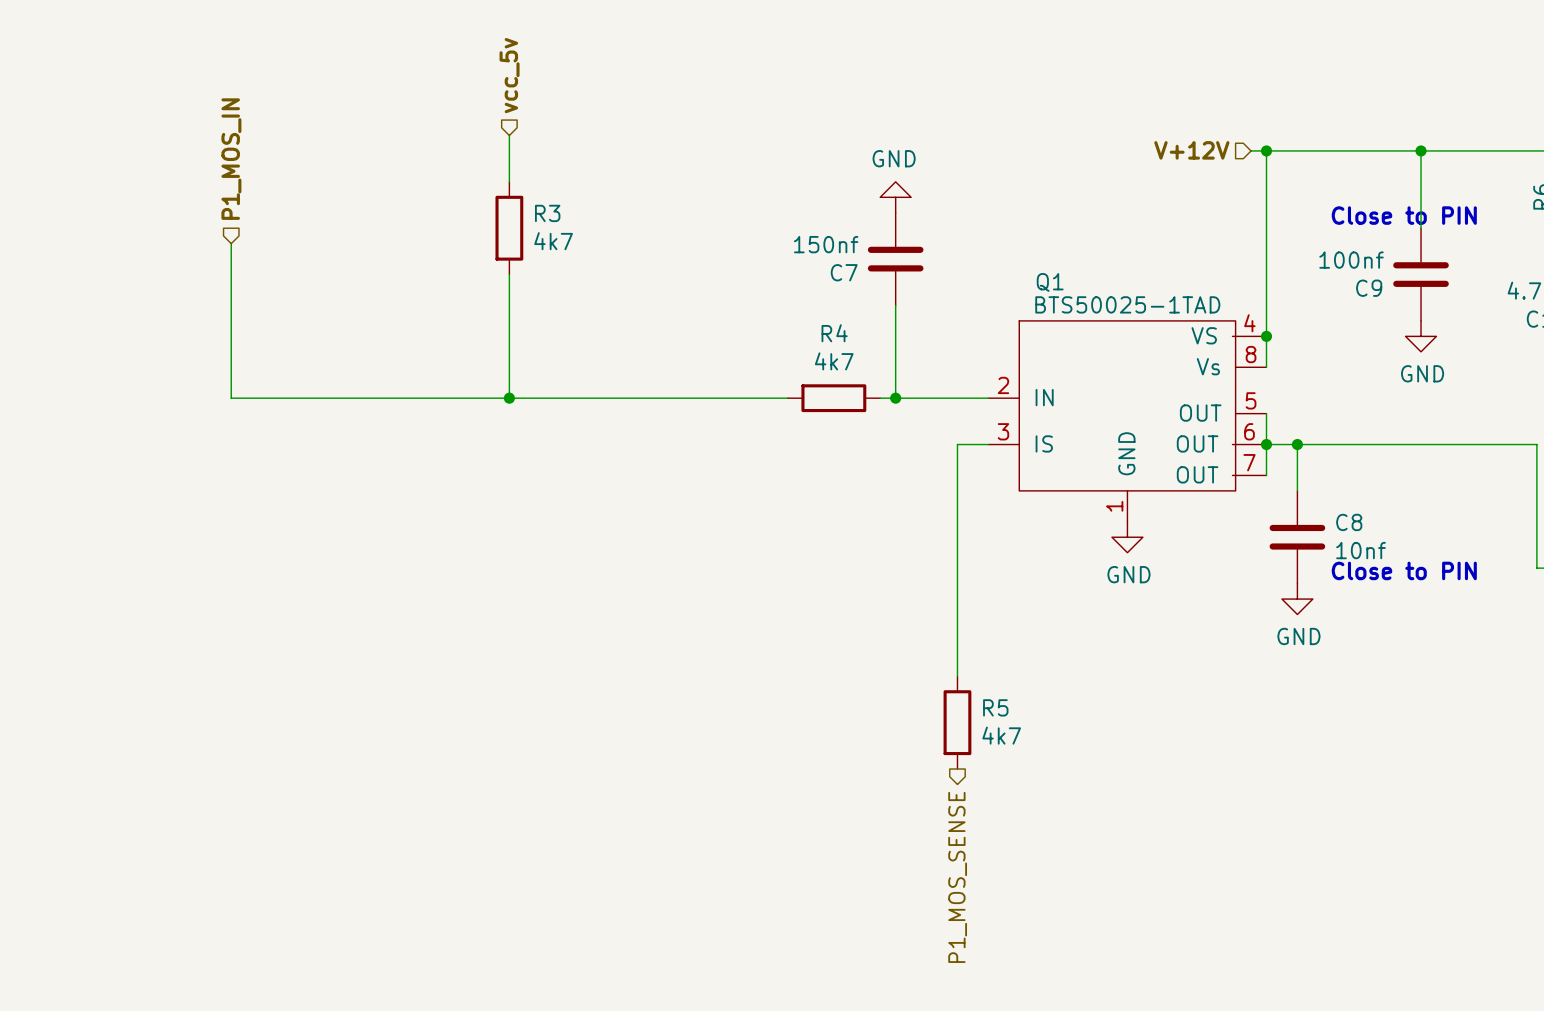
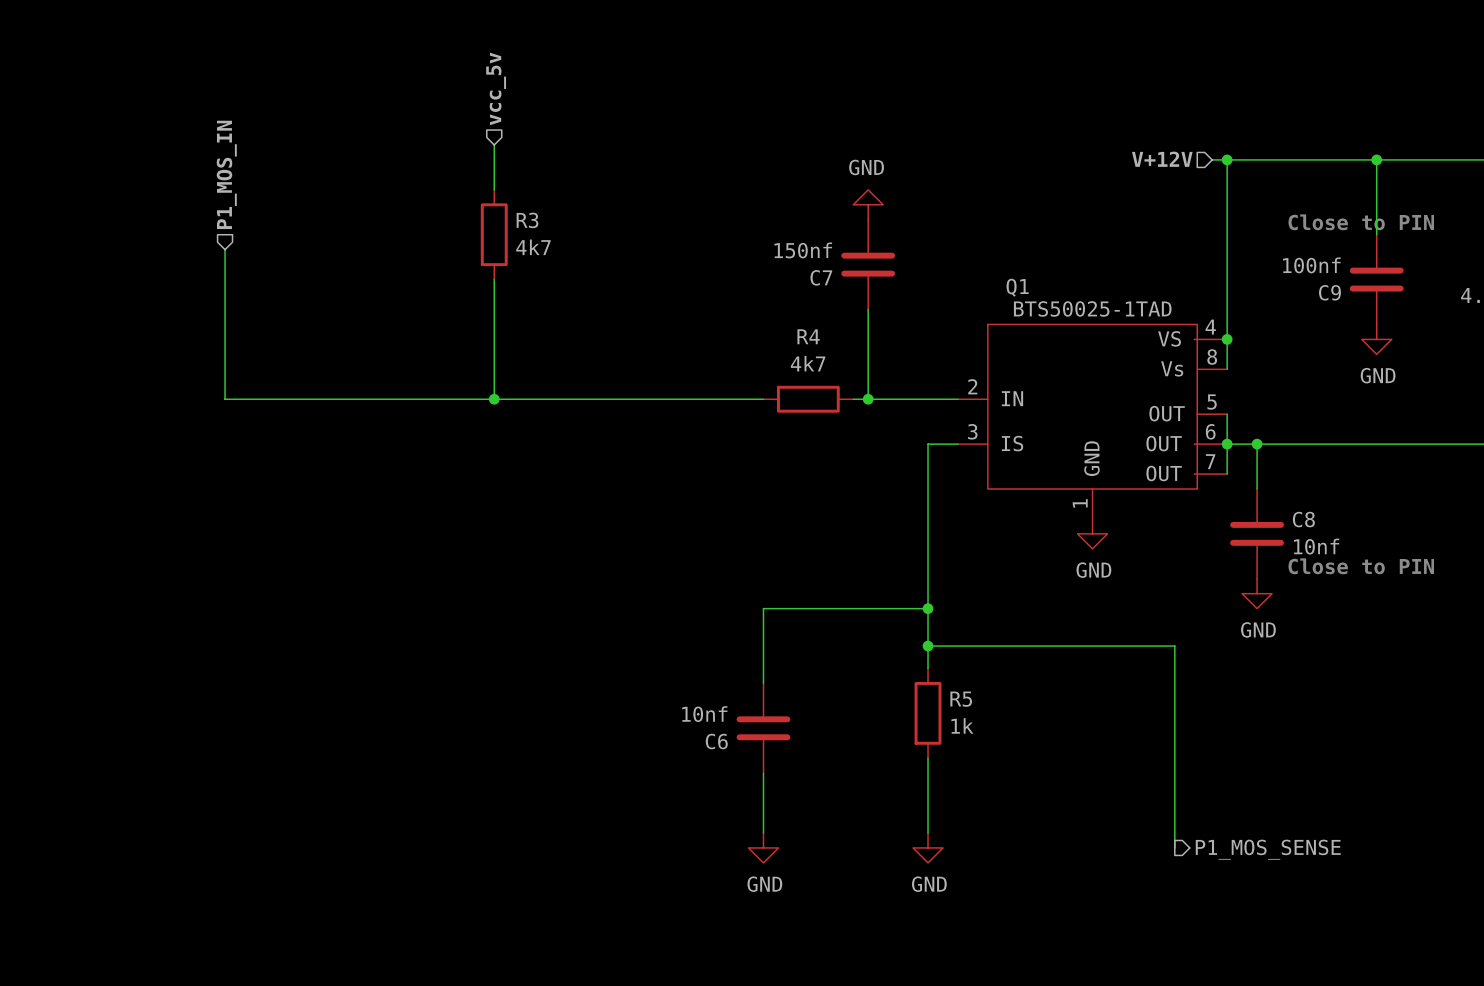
wire: none -> (928, 608) (763, 608) (763, 683)
junction: none -> (928, 608)
wire: none -> (928, 646) (1174, 646) (1174, 847)
junction: none -> (928, 646)
R5 value: 4k7 (1001, 735) -> 1k (962, 725)
C6: none -> 10nf (763, 728)
wire: none -> (928, 758) (928, 833)
wire: none -> (763, 773) (763, 833)
power symbol: none -> GND (763, 847)
power symbol: none -> GND (928, 847)
hierarchical label rotation: 0° (957, 877) -> 90° counterclockwise (1268, 849)
hierarchical label position: P1_MOS_SENSE (957, 877) -> P1_MOS_SENSE (1268, 849)

